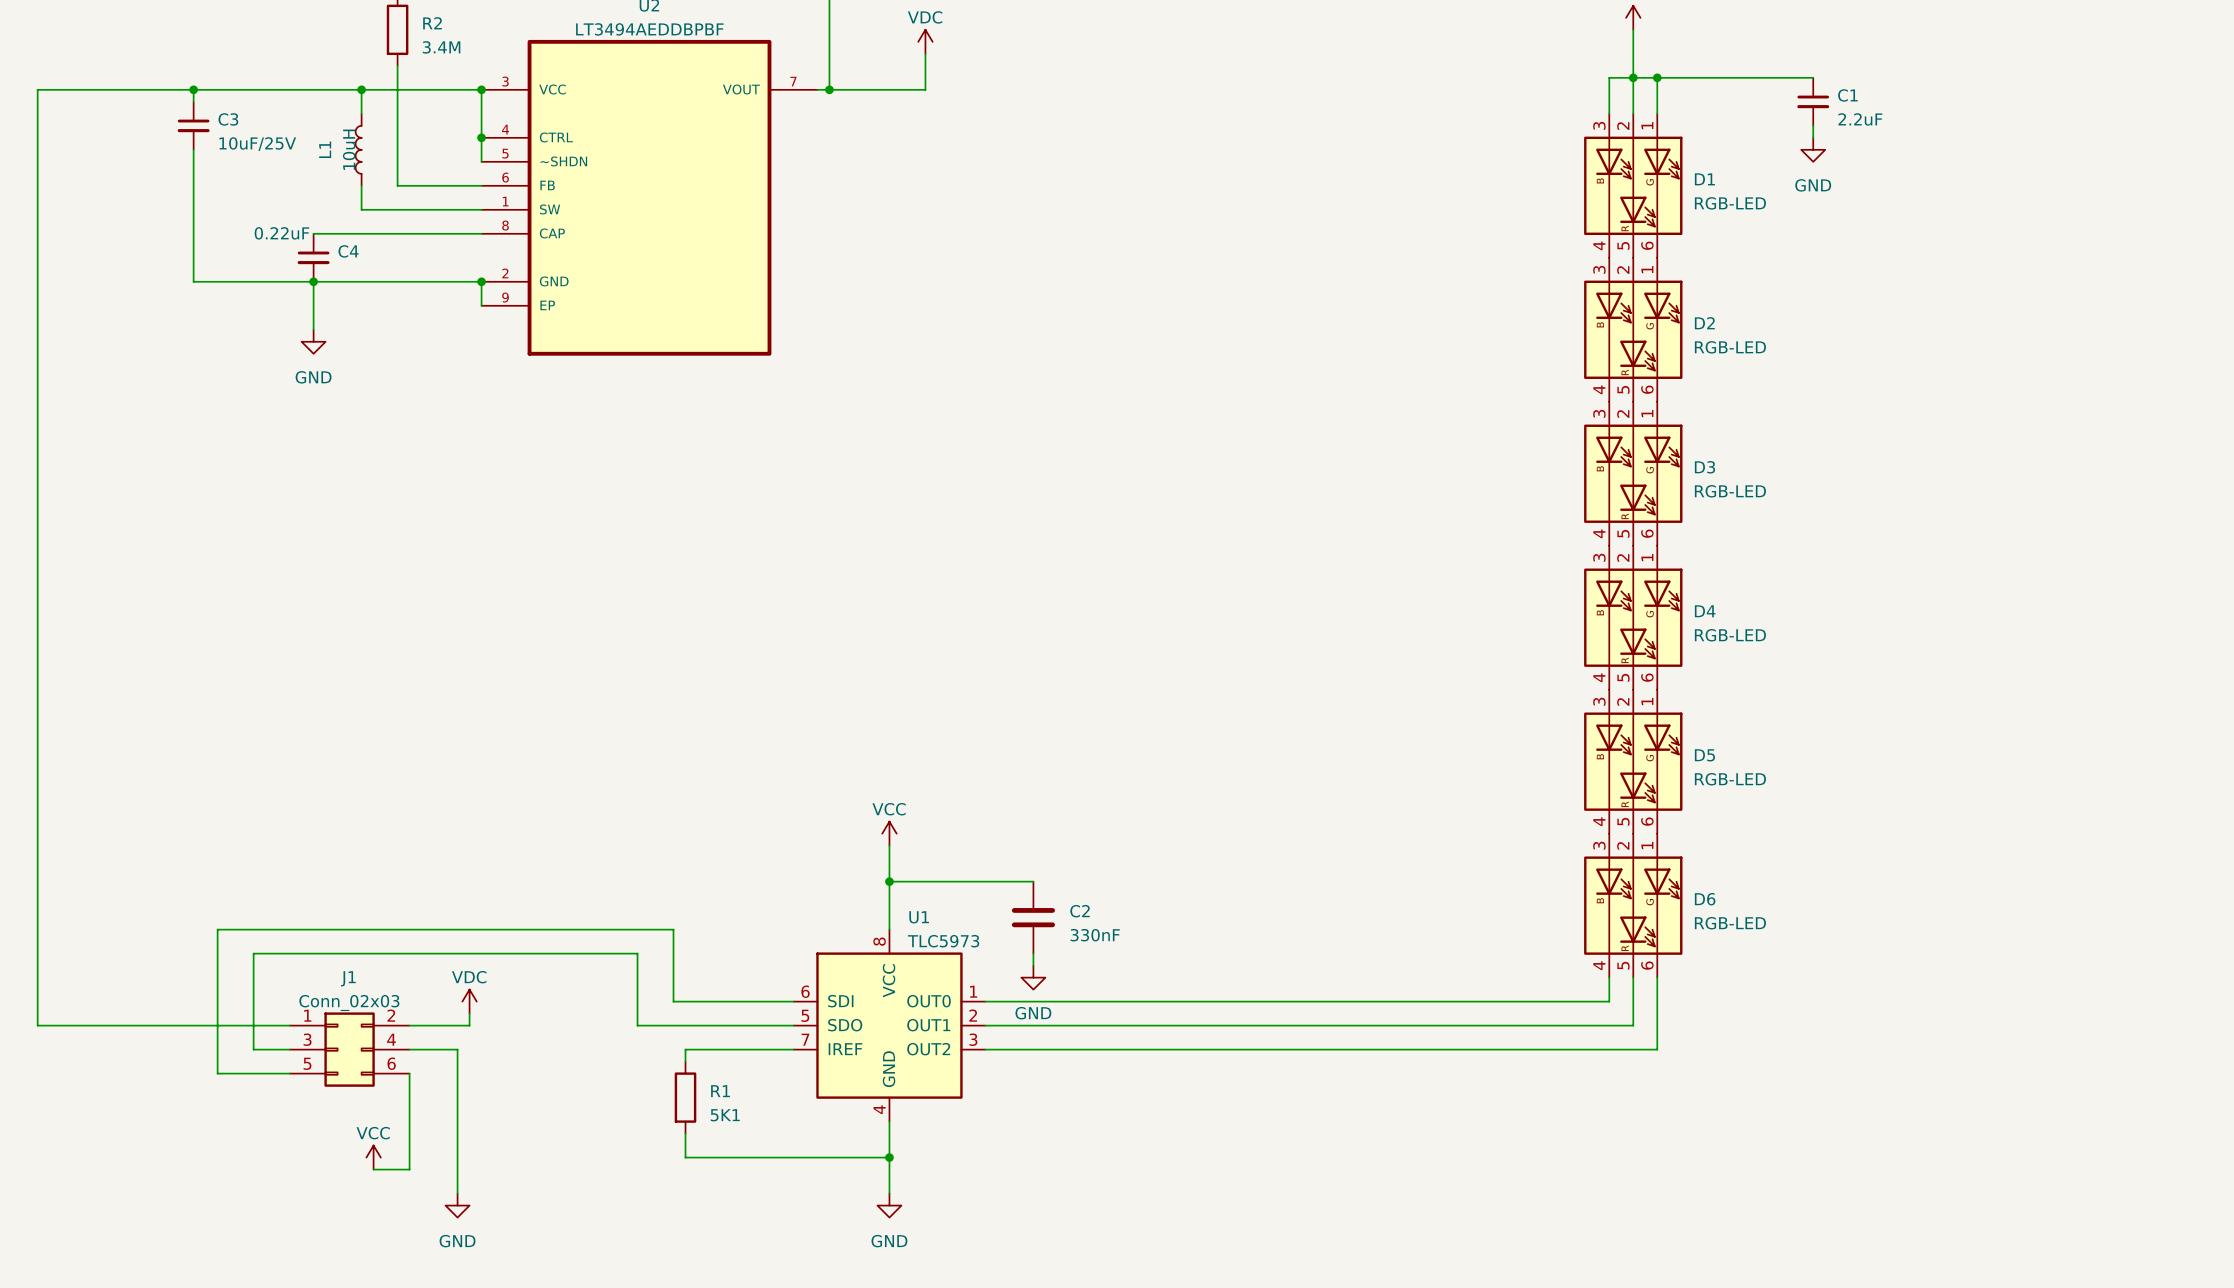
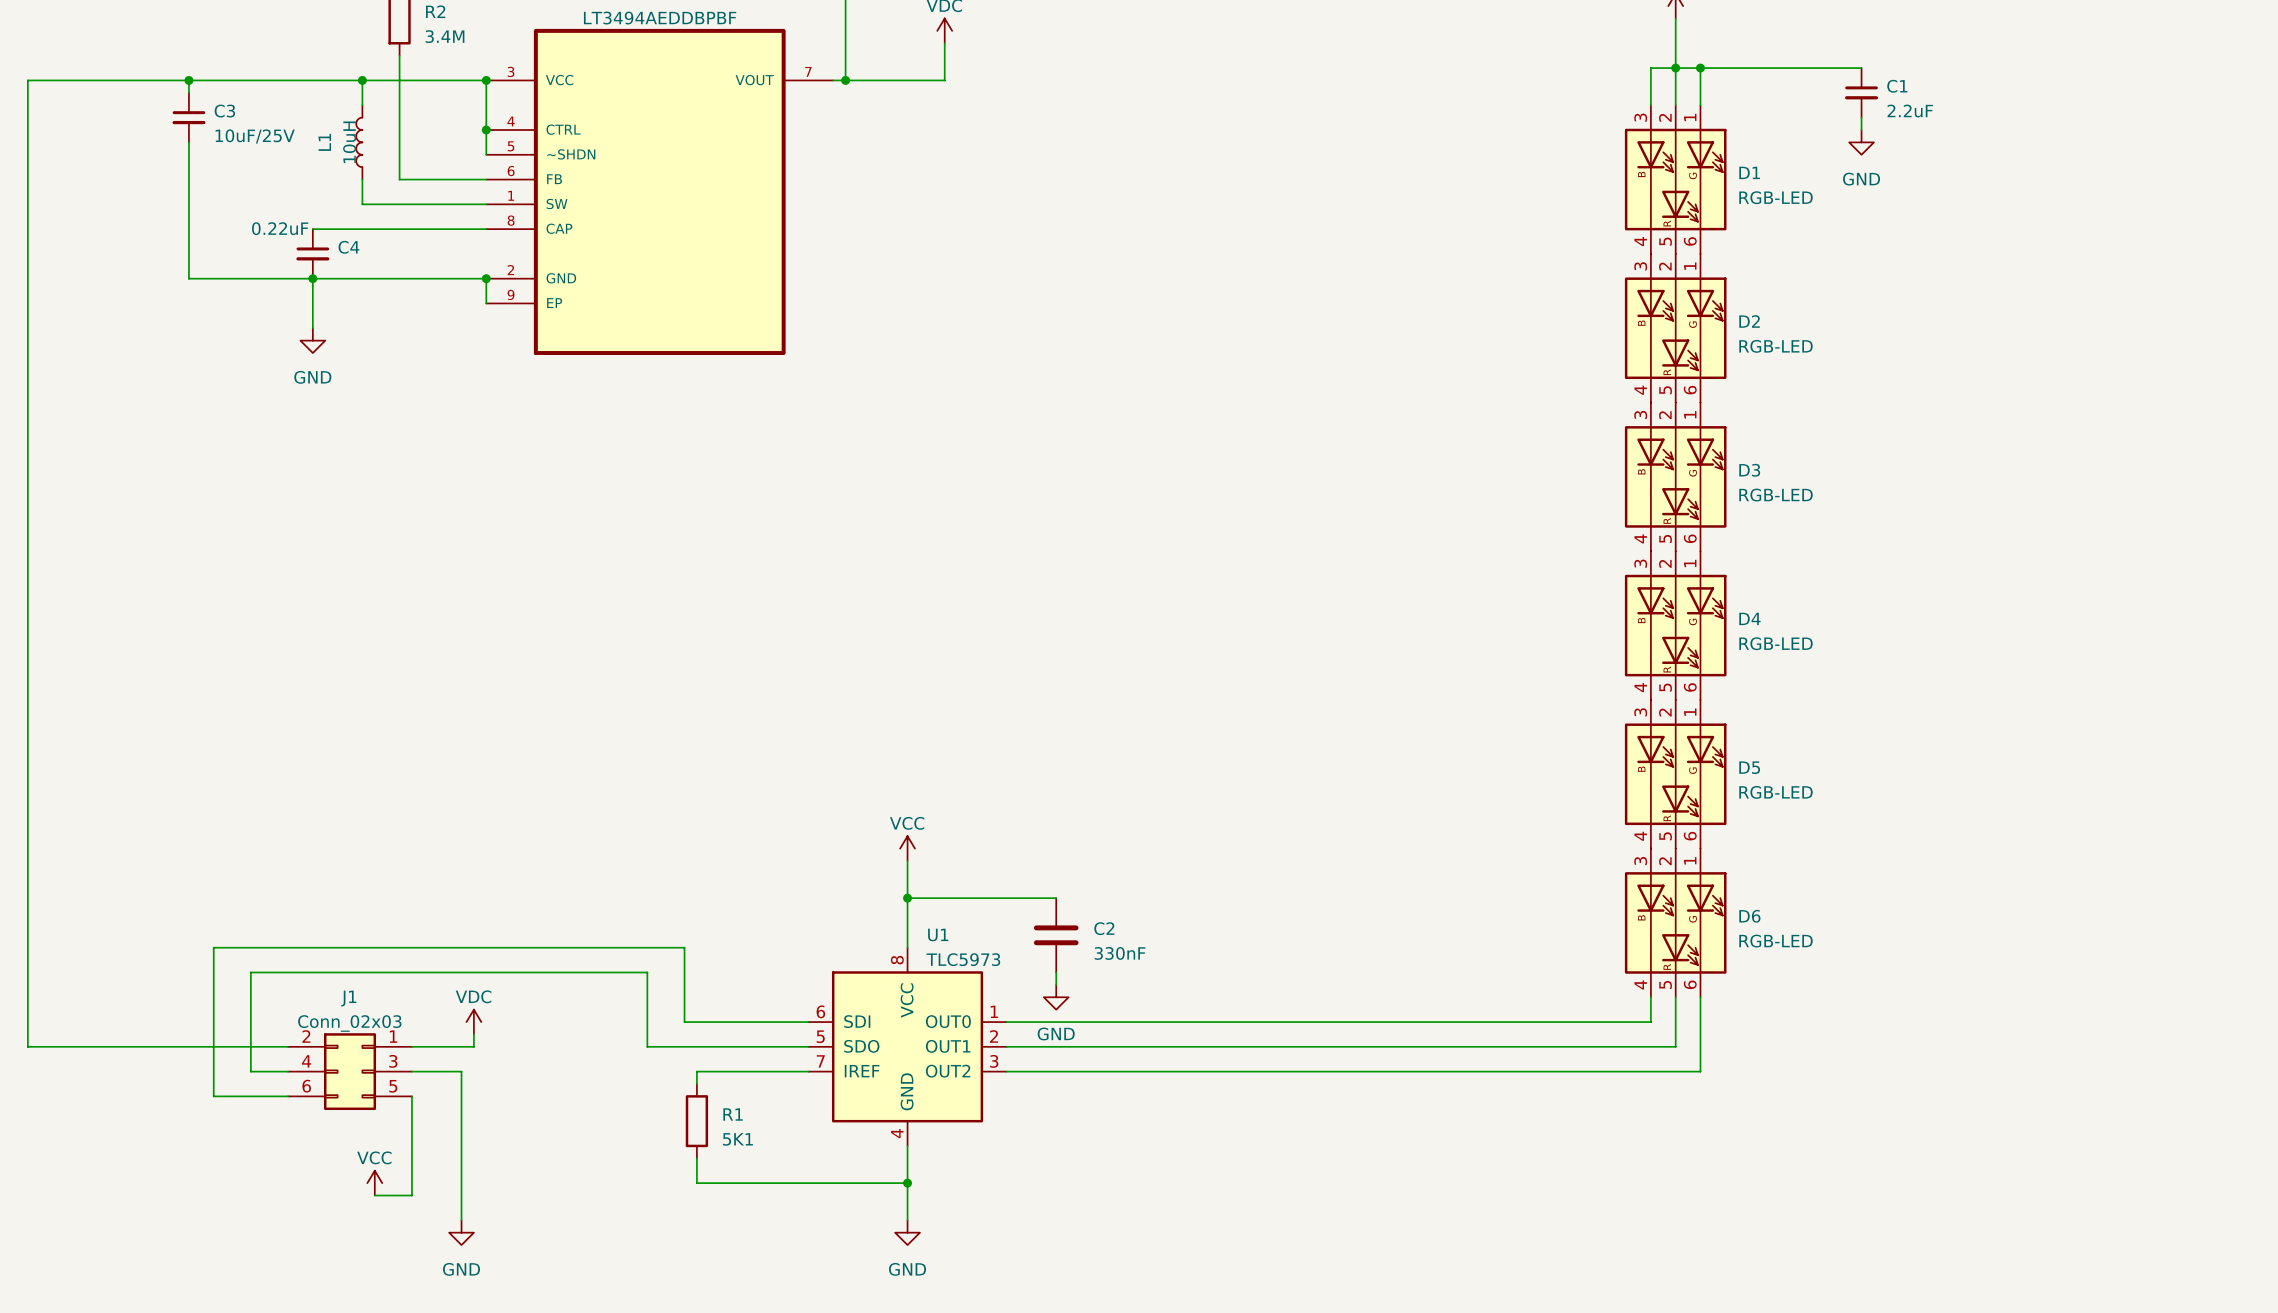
J1 flip: as is (349, 1049) -> left-right (350, 1071)

